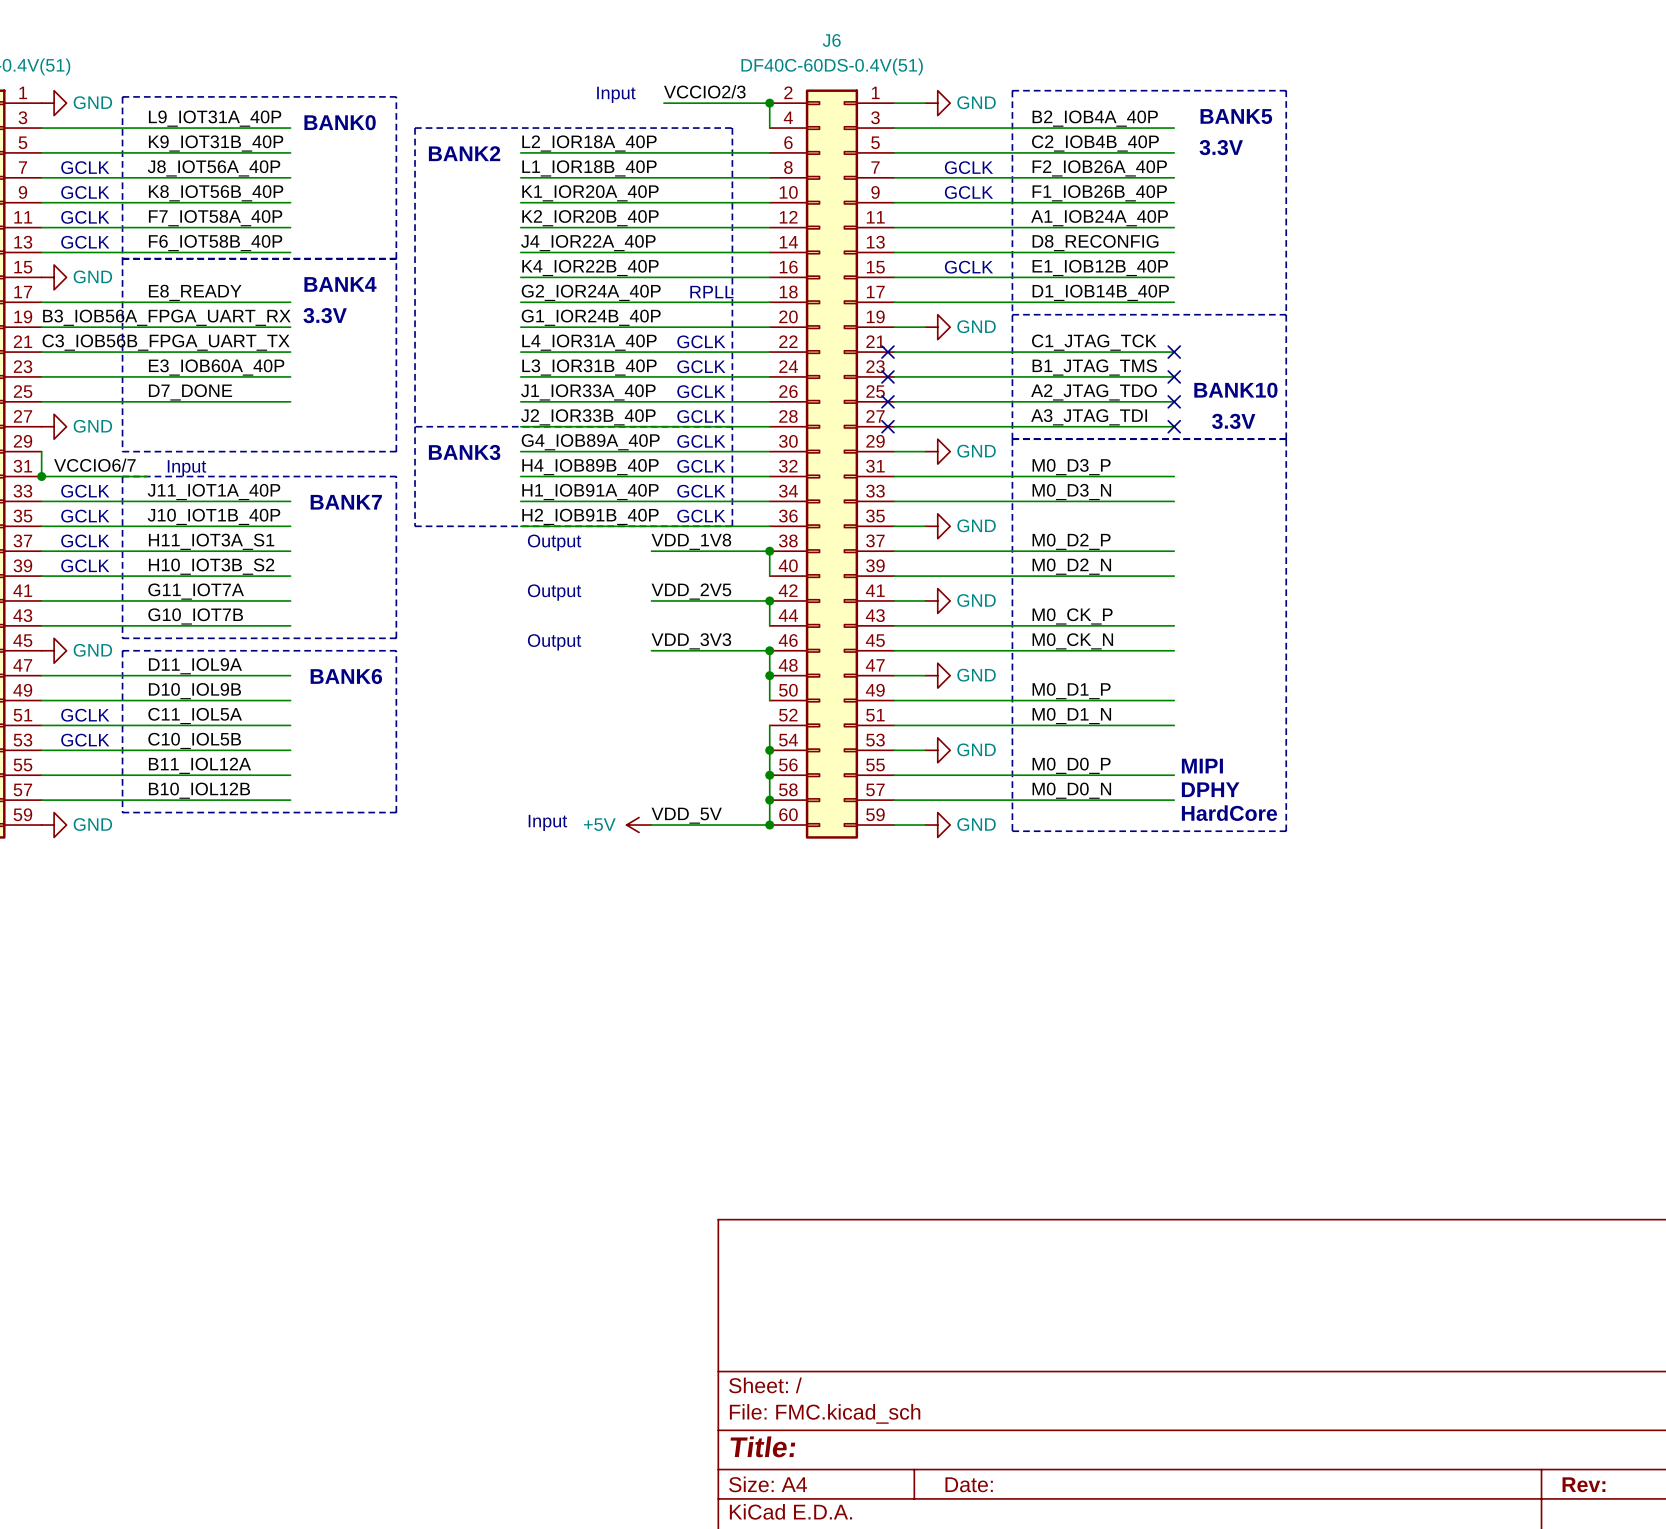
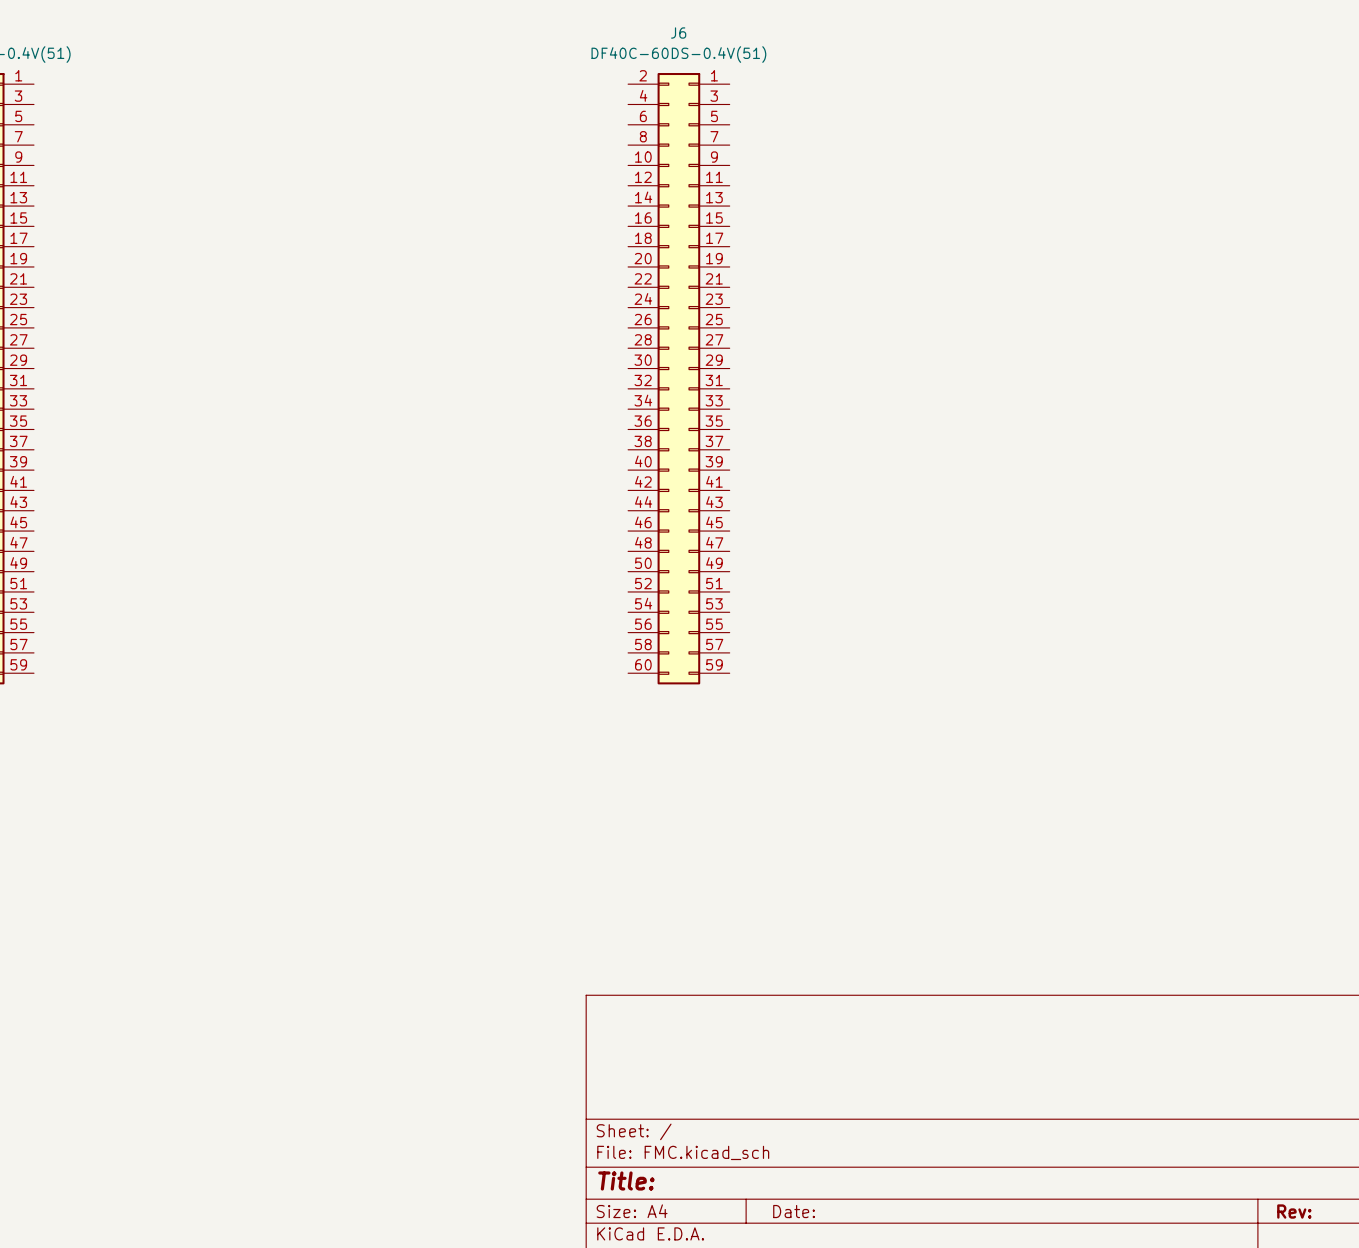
line: (1012, 90) (1012, 831) (1286, 831) (1286, 90) (1012, 90) -> none
label: VCCIO2/3 (704, 91) -> none
text: Input (616, 94) -> none
line: (122, 96) (122, 451) (396, 451) (396, 96) (122, 96) -> none
power symbol: GND (54, 103) -> none
wire: (663, 103) (769, 103) (769, 128) -> none
junction: (769, 103) -> none
wire: (894, 103) (925, 103) -> none
power symbol: GND (937, 103) -> none
text: BANK5 (1236, 116) -> none
label: L9_IOT31A_40P (215, 118) -> none
label: B2_IOB4A_40P (1095, 118) -> none
text: BANK0 (340, 122) -> none
wire: (41, 128) (290, 128) -> none
line: (415, 128) (415, 526) (732, 526) (732, 128) (415, 128) -> none
wire: (894, 128) (1174, 128) -> none
label: K9_IOT31B_40P (216, 143) -> none
label: L2_IOR18A_40P (589, 143) -> none
label: C2_IOB4B_40P (1095, 143) -> none
text: 3.3V (1221, 147) -> none
wire: (41, 152) (290, 152) -> none
wire: (520, 152) (769, 152) -> none
wire: (894, 152) (1174, 152) -> none
text: BANK2 (464, 153) -> none
text: GCLK (85, 167) -> none
text: GCLK (968, 167) -> none
label: J8_IOT56A_40P (213, 168) -> none
label: L1_IOR18B_40P (589, 168) -> none
label: F2_IOB26A_40P (1099, 168) -> none
wire: (41, 177) (290, 177) -> none
wire: (520, 177) (769, 177) -> none
wire: (894, 177) (1174, 177) -> none
text: GCLK (85, 192) -> none
text: GCLK (968, 192) -> none
label: K8_IOT56B_40P (216, 193) -> none
label: K1_IOR20A_40P (590, 193) -> none
label: F1_IOB26B_40P (1099, 193) -> none
wire: (41, 202) (290, 202) -> none
wire: (520, 202) (769, 202) -> none
wire: (894, 202) (1174, 202) -> none
text: GCLK (85, 217) -> none
label: F7_IOT58A_40P (215, 218) -> none
label: K2_IOR20B_40P (590, 218) -> none
label: A1_IOB24A_40P (1099, 218) -> none
wire: (41, 227) (290, 227) -> none
wire: (520, 227) (769, 227) -> none
wire: (894, 227) (1174, 227) -> none
text: GCLK (85, 242) -> none
label: F6_IOT58B_40P (215, 243) -> none
label: J4_IOR22A_40P (588, 243) -> none
label: D8_RECONFIG (1095, 243) -> none
wire: (41, 252) (290, 252) -> none
wire: (520, 252) (769, 252) -> none
wire: (894, 252) (1174, 252) -> none
line: (122, 258) (396, 258) -> none
label: K4_IOR22B_40P (590, 267) -> none
text: GCLK (968, 267) -> none
label: E1_IOB12B_40P (1100, 267) -> none
power symbol: GND (54, 277) -> none
wire: (520, 277) (769, 277) -> none
wire: (894, 277) (1174, 277) -> none
text: BANK4 (340, 284) -> none
label: E8_READY (195, 292) -> none
label: G2_IOR24A_40P (591, 292) -> none
text: RPLL (711, 292) -> none
label: D1_IOB14B_40P (1100, 292) -> none
wire: (41, 302) (290, 302) -> none
wire: (520, 302) (769, 302) -> none
wire: (894, 302) (1174, 302) -> none
line: (1012, 314) (1286, 314) -> none
text: 3.3V (325, 315) -> none
label: B3_IOB56A_FPGA_UART_RX (166, 317) -> none
label: G1_IOR24B_40P (591, 317) -> none
wire: (41, 327) (290, 327) -> none
wire: (520, 327) (769, 327) -> none
wire: (894, 327) (925, 327) -> none
power symbol: GND (937, 327) -> none
text: GCLK (701, 341) -> none
label: C3_IOB56B_FPGA_UART_TX (166, 342) -> none
label: L4_IOR31A_40P (589, 342) -> none
label: C1_JTAG_TCK (1094, 342) -> none
wire: (41, 352) (290, 352) -> none
wire: (520, 352) (769, 352) -> none
no-connect mark: (887, 352) -> none
wire: (894, 352) (1174, 352) -> none
no-connect mark: (1174, 352) -> none
text: GCLK (701, 366) -> none
label: E3_IOB60A_40P (216, 367) -> none
label: L3_IOR31B_40P (589, 367) -> none
label: B1_JTAG_TMS (1094, 367) -> none
wire: (41, 376) (290, 376) -> none
wire: (520, 376) (769, 376) -> none
no-connect mark: (887, 376) -> none
wire: (894, 376) (1174, 376) -> none
no-connect mark: (1174, 376) -> none
text: BANK10 (1235, 390) -> none
text: GCLK (701, 391) -> none
label: D7_DONE (190, 392) -> none
label: J1_IOR33A_40P (588, 392) -> none
label: A2_JTAG_TDO (1094, 392) -> none
wire: (41, 401) (290, 401) -> none
wire: (520, 401) (769, 401) -> none
no-connect mark: (887, 401) -> none
wire: (894, 401) (1174, 401) -> none
no-connect mark: (1174, 401) -> none
text: GCLK (701, 416) -> none
label: J2_IOR33B_40P (588, 417) -> none
label: A3_JTAG_TDI (1089, 417) -> none
text: 3.3V (1233, 421) -> none
power symbol: GND (54, 426) -> none
line: (415, 426) (732, 426) -> none
wire: (520, 426) (769, 426) -> none
no-connect mark: (887, 426) -> none
wire: (894, 426) (1174, 426) -> none
no-connect mark: (1174, 426) -> none
line: (1012, 439) (1286, 439) -> none
text: GCLK (701, 441) -> none
label: G4_IOB89A_40P (590, 442) -> none
wire: (41, 451) (41, 476) (147, 476) -> none
wire: (520, 451) (769, 451) -> none
wire: (894, 451) (925, 451) -> none
power symbol: GND (937, 451) -> none
text: BANK3 (464, 452) -> none
label: VCCIO6/7 (94, 465) -> none
text: GCLK (701, 466) -> none
label: H4_IOB89B_40P (590, 467) -> none
label: M0_D3_P (1071, 467) -> none
text: Input (186, 468) -> none
junction: (41, 476) -> none
line: (122, 476) (122, 638) (396, 638) (396, 476) (122, 476) -> none
wire: (520, 476) (769, 476) -> none
wire: (894, 476) (1174, 476) -> none
text: GCLK (85, 491) -> none
text: GCLK (701, 491) -> none
label: J11_IOT1A_40P (213, 492) -> none
label: H1_IOB91A_40P (590, 492) -> none
label: M0_D3_N (1071, 492) -> none
wire: (41, 501) (290, 501) -> none
wire: (520, 501) (769, 501) -> none
wire: (894, 501) (1174, 501) -> none
text: BANK7 (346, 502) -> none
text: GCLK (85, 516) -> none
label: J10_IOT1B_40P (213, 516) -> none
label: H2_IOB91B_40P (590, 516) -> none
text: GCLK (701, 516) -> none
wire: (41, 526) (290, 526) -> none
wire: (520, 526) (769, 526) -> none
wire: (894, 526) (925, 526) -> none
power symbol: GND (937, 526) -> none
text: GCLK (85, 540) -> none
label: H11_IOT3A_S1 (211, 541) -> none
label: VDD_1V8 (691, 541) -> none
label: M0_D2_P (1071, 541) -> none
text: Output (554, 542) -> none
wire: (41, 551) (290, 551) -> none
wire: (651, 551) (769, 551) (769, 576) -> none
junction: (769, 551) -> none
wire: (894, 551) (1174, 551) -> none
text: GCLK (85, 565) -> none
label: H10_IOT3B_S2 (211, 566) -> none
label: M0_D2_N (1071, 566) -> none
wire: (41, 576) (290, 576) -> none
wire: (894, 576) (1174, 576) -> none
label: G11_IOT7A (196, 591) -> none
label: VDD_2V5 (691, 591) -> none
text: Output (554, 592) -> none
wire: (41, 600) (290, 600) -> none
wire: (651, 600) (769, 600) (769, 625) -> none
junction: (769, 600) -> none
wire: (894, 600) (925, 600) -> none
power symbol: GND (937, 600) -> none
label: G10_IOT7B (195, 616) -> none
label: M0_CK_P (1072, 616) -> none
wire: (41, 625) (290, 625) -> none
wire: (894, 625) (1174, 625) -> none
label: VDD_3V3 (691, 641) -> none
label: M0_CK_N (1072, 641) -> none
text: Output (554, 642) -> none
power symbol: GND (54, 650) -> none
line: (122, 650) (122, 812) (396, 812) (396, 650) (122, 650) -> none
wire: (651, 650) (769, 650) (769, 700) -> none
junction: (769, 650) -> none
wire: (894, 650) (1174, 650) -> none
label: D11_IOL9A (195, 666) -> none
wire: (41, 675) (290, 675) -> none
junction: (769, 675) -> none
wire: (894, 675) (925, 675) -> none
power symbol: GND (937, 675) -> none
text: BANK6 (346, 676) -> none
label: D10_IOL9B (194, 691) -> none
label: M0_D1_P (1071, 691) -> none
wire: (41, 700) (290, 700) -> none
wire: (894, 700) (1174, 700) -> none
text: GCLK (85, 715) -> none
label: C11_IOL5A (195, 716) -> none
label: M0_D1_N (1071, 716) -> none
wire: (41, 725) (290, 725) -> none
wire: (769, 725) (769, 825) (651, 825) -> none
wire: (894, 725) (1174, 725) -> none
text: GCLK (85, 740) -> none
label: C10_IOL5B (194, 740) -> none
wire: (41, 750) (290, 750) -> none
junction: (769, 750) -> none
wire: (894, 750) (925, 750) -> none
power symbol: GND (937, 750) -> none
label: B11_IOL12A (199, 765) -> none
label: M0_D0_P (1071, 765) -> none
text: MIPI (1202, 766) -> none
wire: (41, 775) (290, 775) -> none
junction: (769, 775) -> none
wire: (894, 775) (1174, 775) -> none
text: DPHY (1210, 789) -> none
label: B10_IOL12B (199, 790) -> none
label: M0_D0_N (1071, 790) -> none
wire: (41, 800) (290, 800) -> none
junction: (769, 800) -> none
wire: (894, 800) (1174, 800) -> none
text: HardCore (1229, 813) -> none
label: VDD_5V (686, 815) -> none
text: Input (547, 822) -> none
power symbol: GND (54, 825) -> none
power symbol: +5V (639, 825) -> none
junction: (769, 825) -> none
wire: (894, 825) (925, 825) -> none
power symbol: GND (937, 825) -> none

